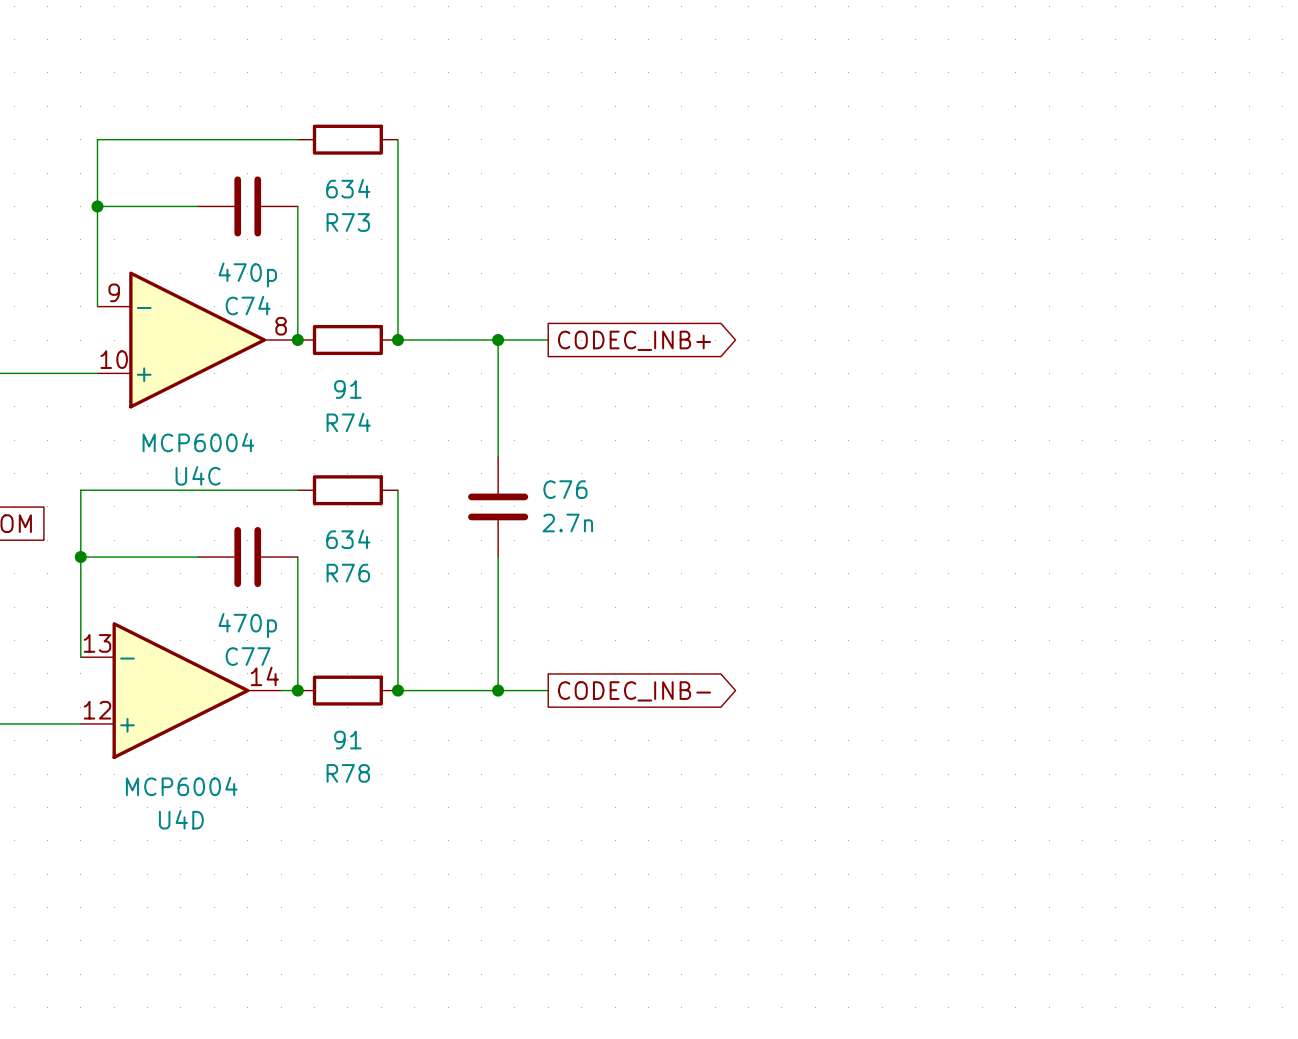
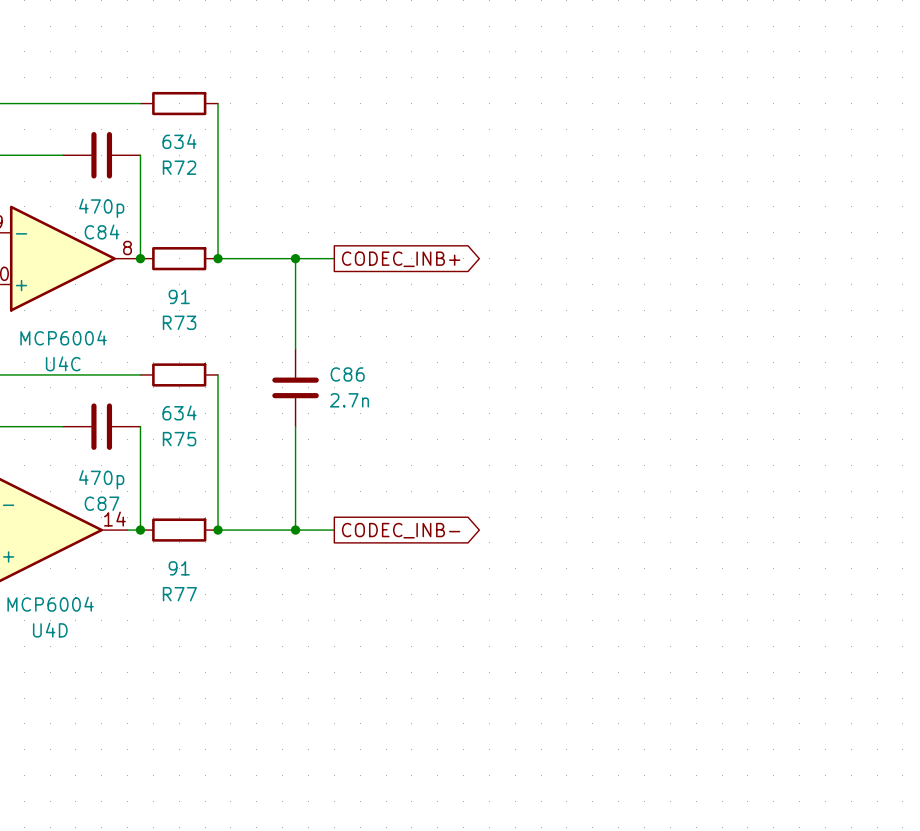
R73 name: R73 (348, 222) -> R72 (179, 167)
C74 name: C74 (248, 305) -> C84 (102, 232)
R74 name: R74 (348, 422) -> R73 (179, 322)
C76 name: C76 (565, 489) -> C86 (347, 374)
R76 name: R76 (348, 573) -> R75 (179, 439)
C77 name: C77 (248, 656) -> C87 (102, 503)
R78 name: R78 (348, 773) -> R77 (179, 594)

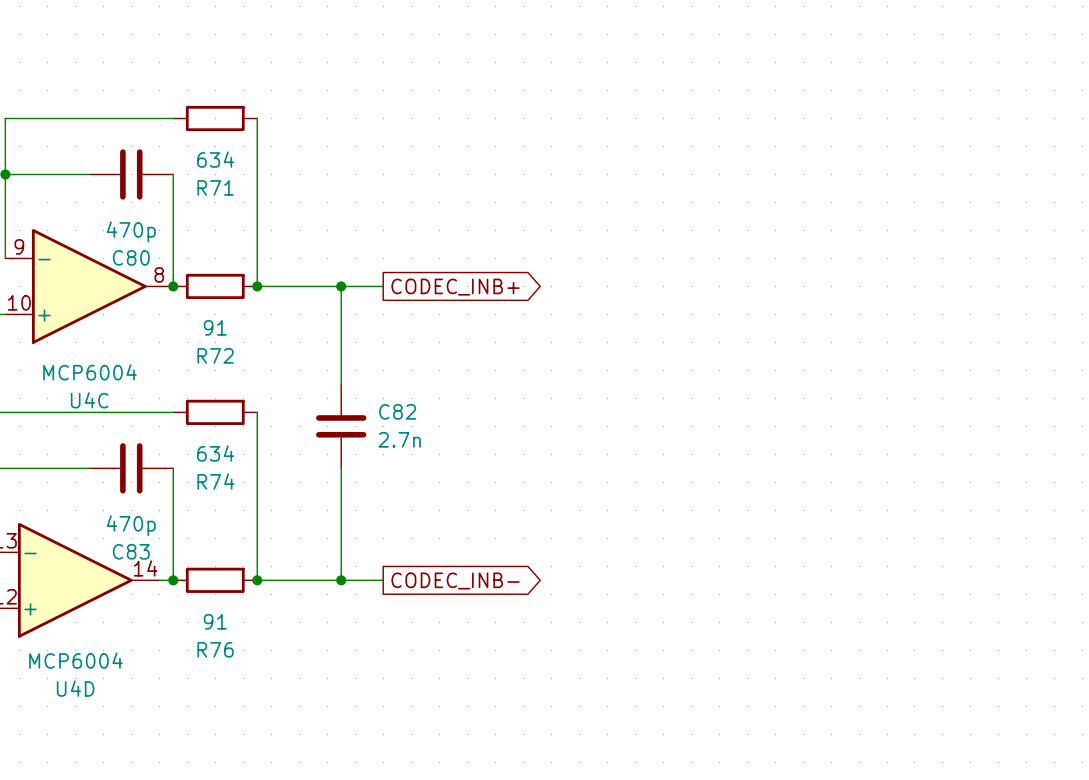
R72 name: R72 (179, 167) -> R71 (215, 187)
C84 name: C84 (102, 232) -> C80 (131, 257)
R73 name: R73 (179, 322) -> R72 (215, 355)
C86 name: C86 (347, 374) -> C82 (397, 411)
R75 name: R75 (179, 439) -> R74 (215, 481)
C87 name: C87 (102, 503) -> C83 (131, 551)
R77 name: R77 (179, 594) -> R76 (215, 649)

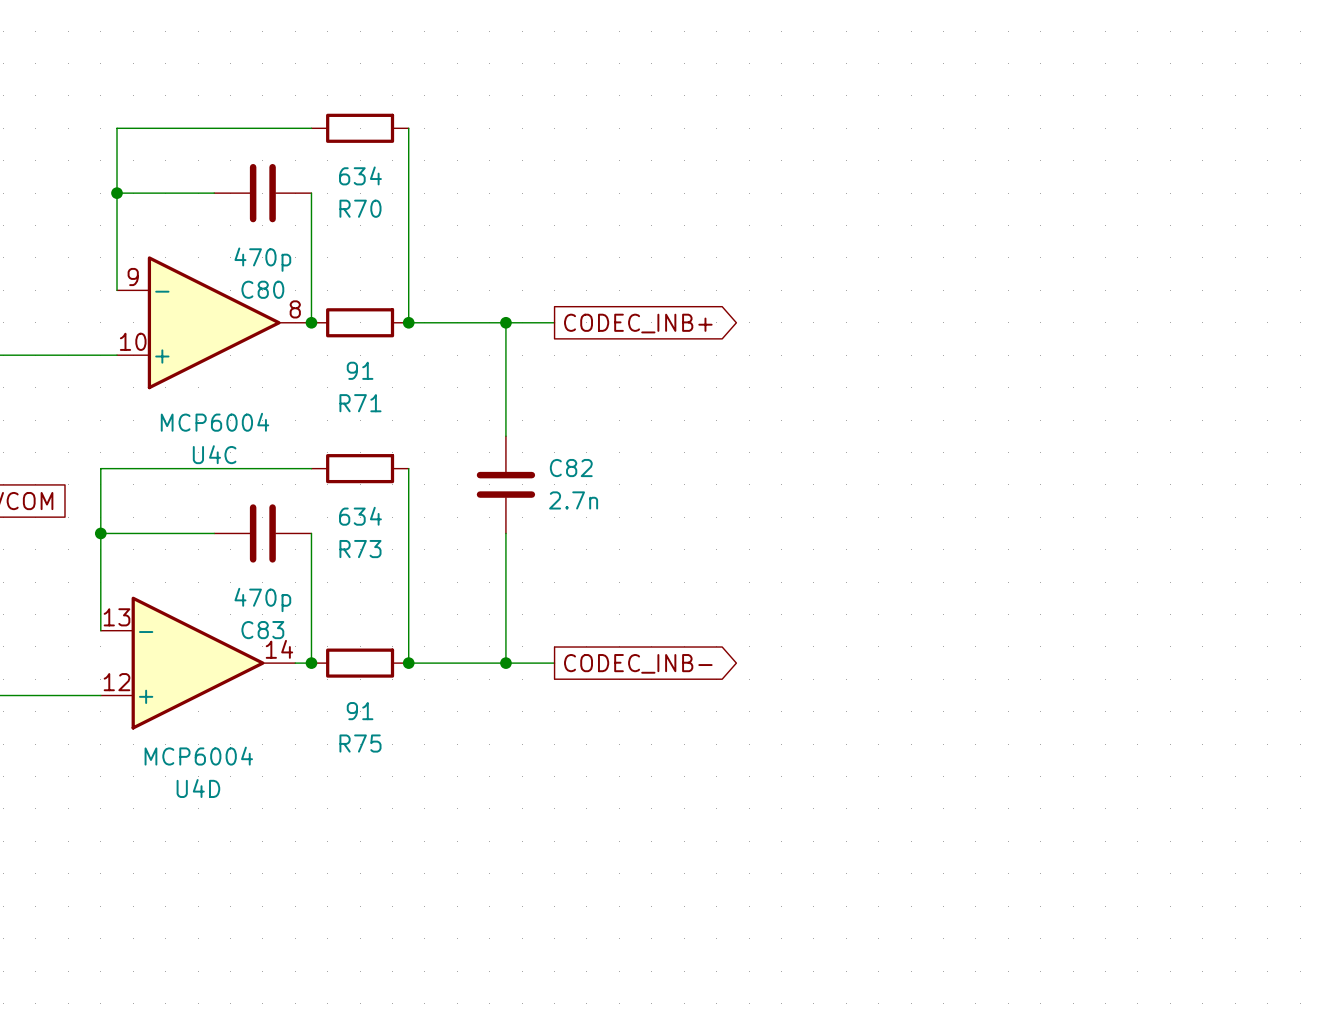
R71 name: R71 (215, 187) -> R70 (360, 208)
R72 name: R72 (215, 355) -> R71 (360, 403)
R74 name: R74 (215, 481) -> R73 (360, 549)
R76 name: R76 (215, 649) -> R75 (360, 743)

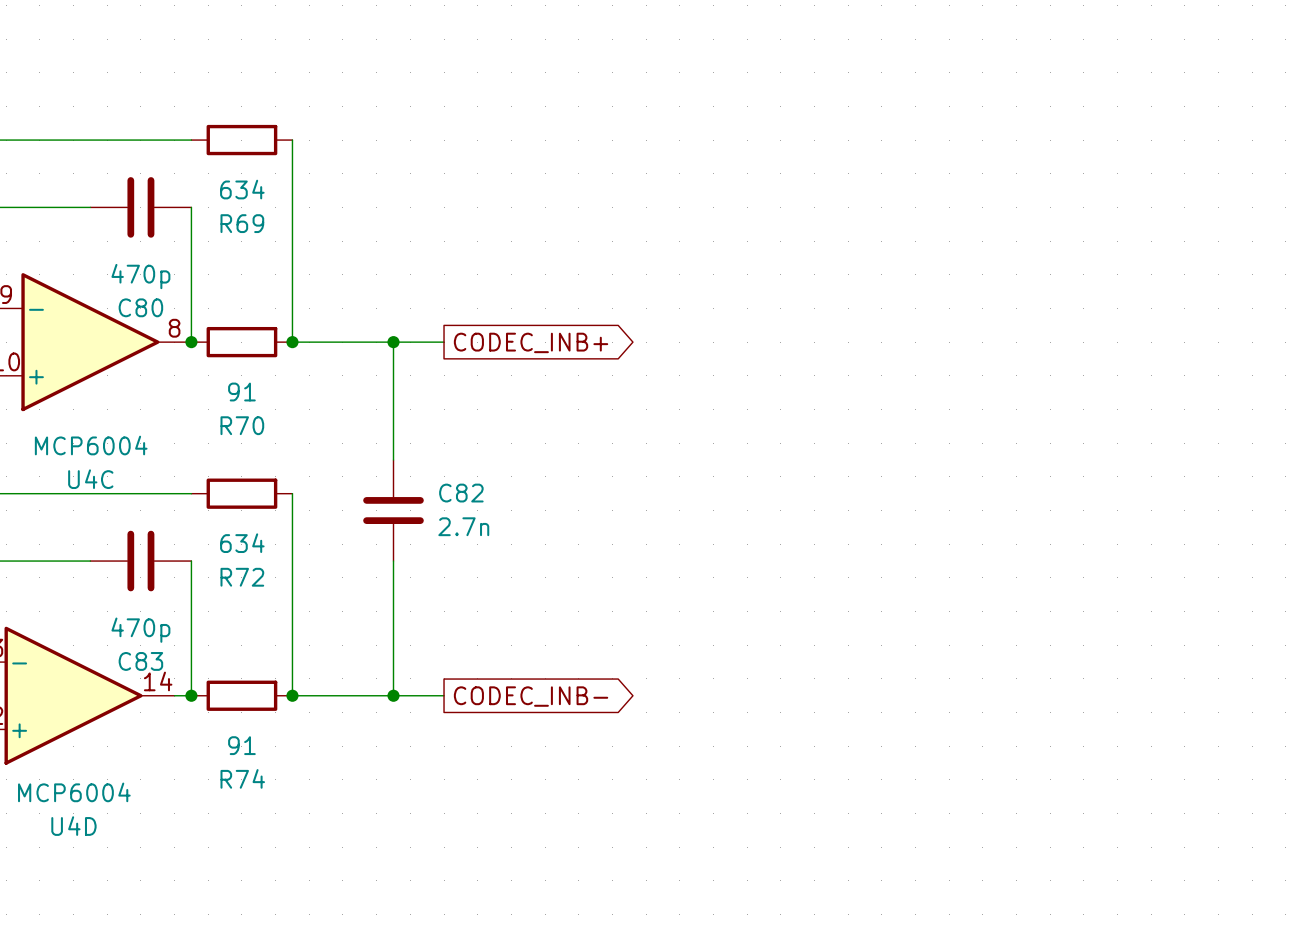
R70 name: R70 (360, 208) -> R69 (242, 223)
R71 name: R71 (360, 403) -> R70 (242, 425)
R73 name: R73 (360, 549) -> R72 (242, 577)
R75 name: R75 (360, 743) -> R74 (242, 778)

